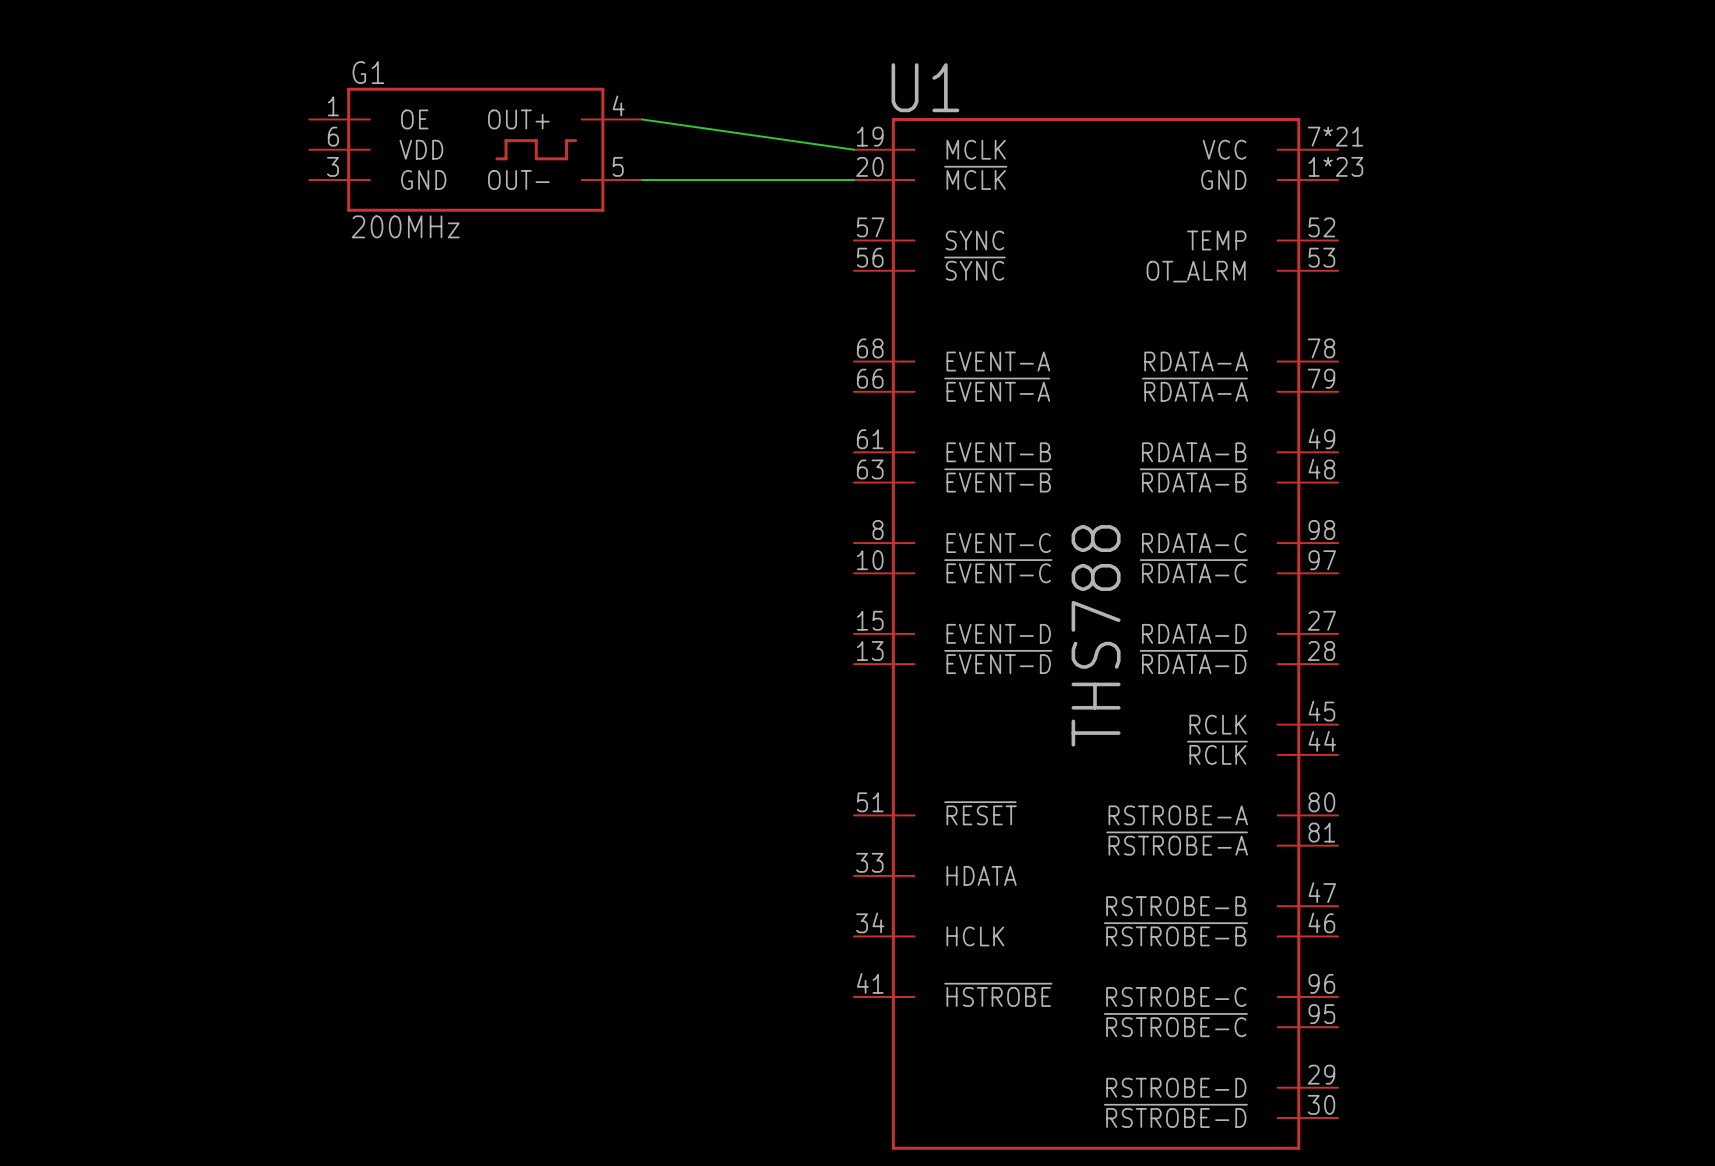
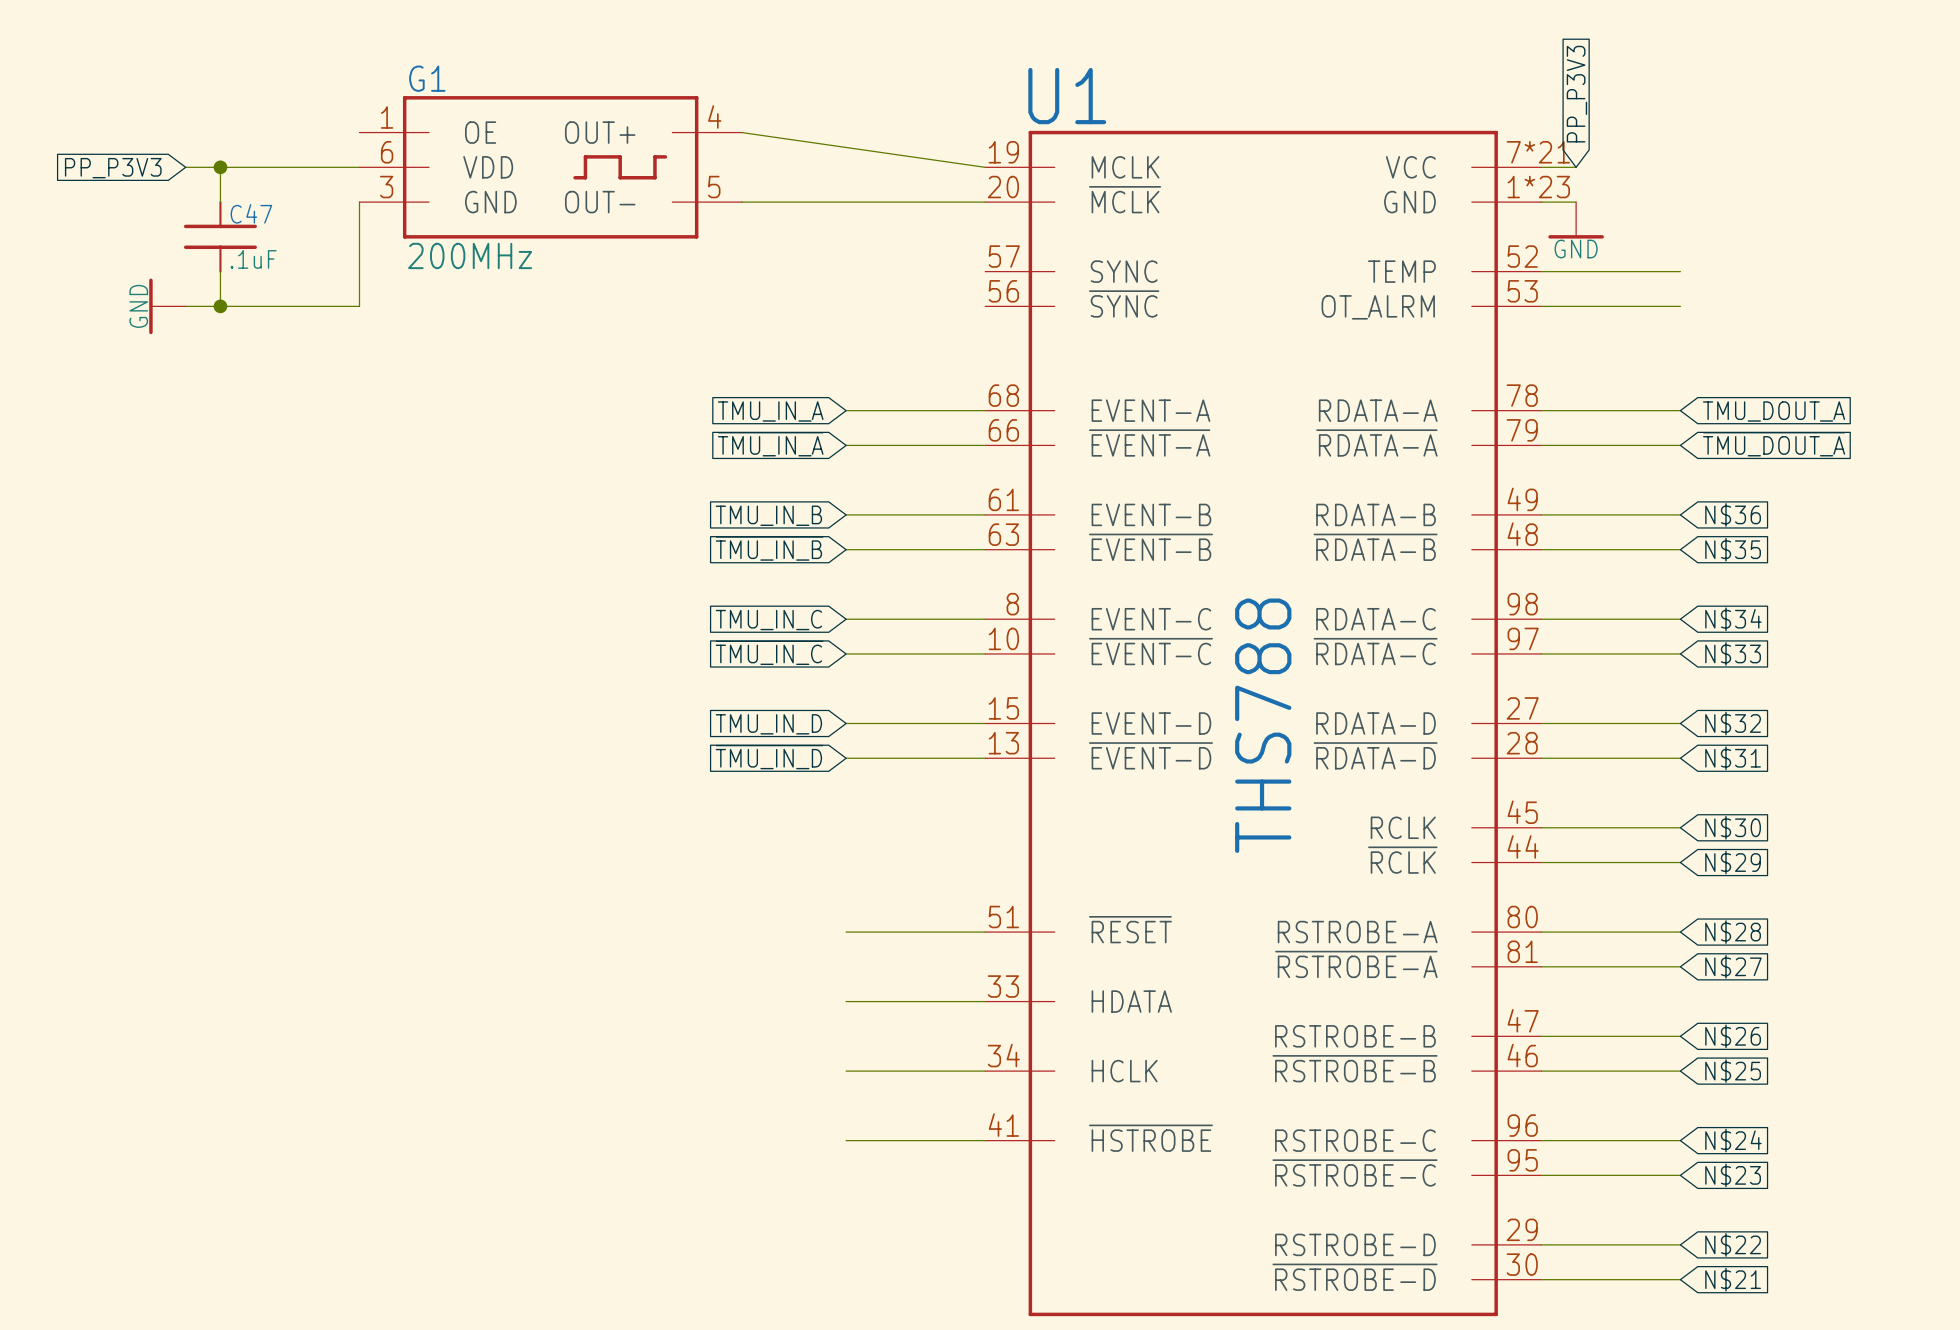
global label: none -> PP_P3V3 (1576, 94)
wire: none -> (185, 167) (359, 167)
wire: none -> (220, 167) (220, 202)
junction: none -> (220, 167)
wire: none -> (1541, 167) (1576, 167)
global label: none -> PP_P3V3 (113, 168)
wire: none -> (359, 202) (359, 306) (185, 306)
wire: none -> (1541, 202) (1576, 202)
power symbol: none -> GND (1576, 220)
C47: none -> .1uF (220, 236)
wire: none -> (220, 271) (220, 306)
wire: none -> (1541, 271) (1680, 271)
power symbol: none -> GND (167, 306)
junction: none -> (220, 306)
wire: none -> (1541, 306) (1680, 306)
wire: none -> (846, 410) (985, 410)
wire: none -> (1541, 410) (1680, 410)
global label: none -> TMU_IN_A (770, 411)
global label: none -> TMU_DOUT_A (1774, 411)
global label: none -> ~{TMU_IN_A} (770, 444)
global label: none -> ~{TMU_DOUT_A} (1774, 444)
wire: none -> (846, 445) (985, 445)
wire: none -> (1541, 445) (1680, 445)
wire: none -> (846, 514) (985, 514)
wire: none -> (1541, 514) (1680, 514)
global label: none -> N$36 (1733, 514)
global label: none -> TMU_IN_B (768, 515)
global label: none -> ~{TMU_IN_B} (769, 548)
wire: none -> (846, 549) (985, 549)
wire: none -> (1541, 549) (1680, 549)
global label: none -> N$35 (1733, 549)
global label: none -> TMU_IN_C (768, 620)
wire: none -> (846, 619) (985, 619)
wire: none -> (1541, 619) (1680, 619)
global label: none -> N$34 (1733, 619)
global label: none -> ~{TMU_IN_C} (769, 652)
wire: none -> (846, 653) (985, 653)
wire: none -> (1541, 653) (1680, 653)
global label: none -> N$33 (1733, 653)
wire: none -> (846, 723) (985, 723)
wire: none -> (1541, 723) (1680, 723)
global label: none -> N$32 (1733, 723)
global label: none -> TMU_IN_D (768, 724)
global label: none -> ~{TMU_IN_D} (769, 757)
wire: none -> (846, 758) (985, 758)
wire: none -> (1541, 758) (1680, 758)
global label: none -> N$31 (1733, 758)
wire: none -> (1541, 827) (1680, 827)
global label: none -> N$30 (1733, 827)
wire: none -> (1541, 862) (1680, 862)
global label: none -> N$29 (1733, 862)
wire: none -> (846, 932) (985, 932)
wire: none -> (1541, 932) (1680, 932)
global label: none -> N$28 (1733, 932)
wire: none -> (1541, 966) (1680, 966)
global label: none -> N$27 (1733, 966)
wire: none -> (846, 1001) (985, 1001)
wire: none -> (1541, 1036) (1680, 1036)
global label: none -> N$26 (1733, 1036)
wire: none -> (846, 1071) (985, 1071)
wire: none -> (1541, 1071) (1680, 1071)
global label: none -> N$25 (1733, 1071)
wire: none -> (846, 1140) (985, 1140)
wire: none -> (1541, 1140) (1680, 1140)
global label: none -> N$24 (1733, 1140)
wire: none -> (1541, 1175) (1680, 1175)
global label: none -> N$23 (1733, 1175)
wire: none -> (1541, 1244) (1680, 1244)
global label: none -> N$22 (1733, 1244)
wire: none -> (1541, 1279) (1680, 1279)
global label: none -> N$21 (1733, 1279)

